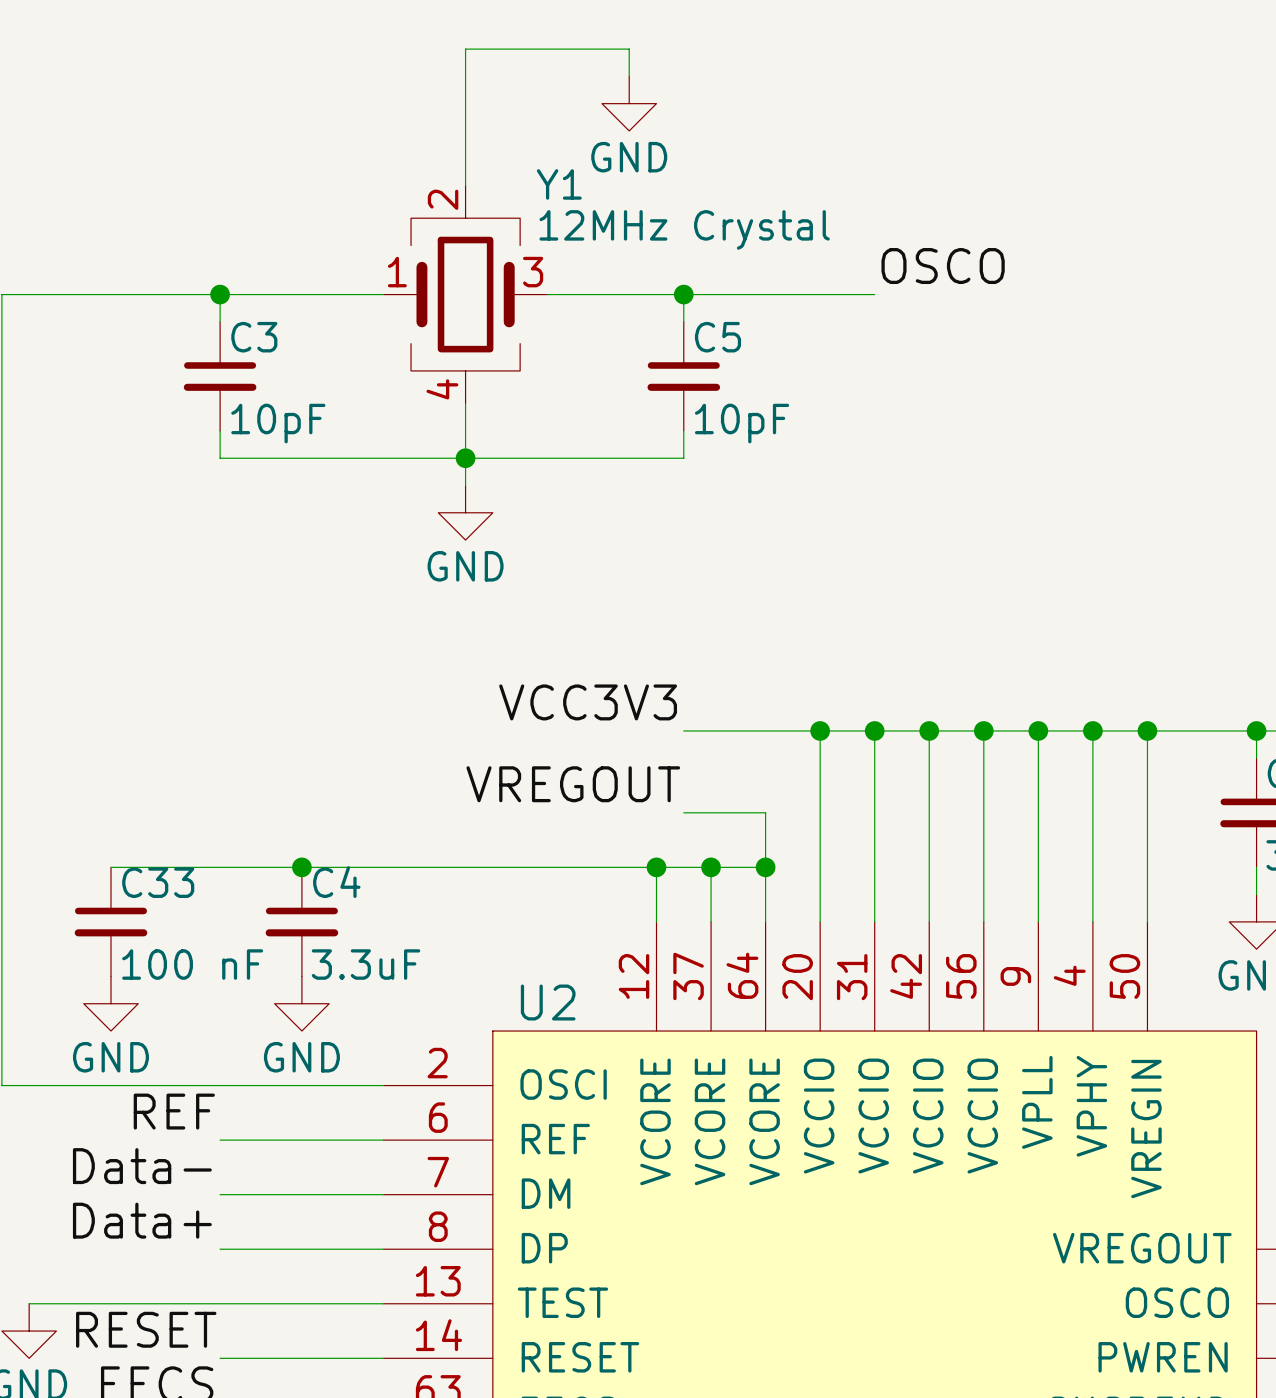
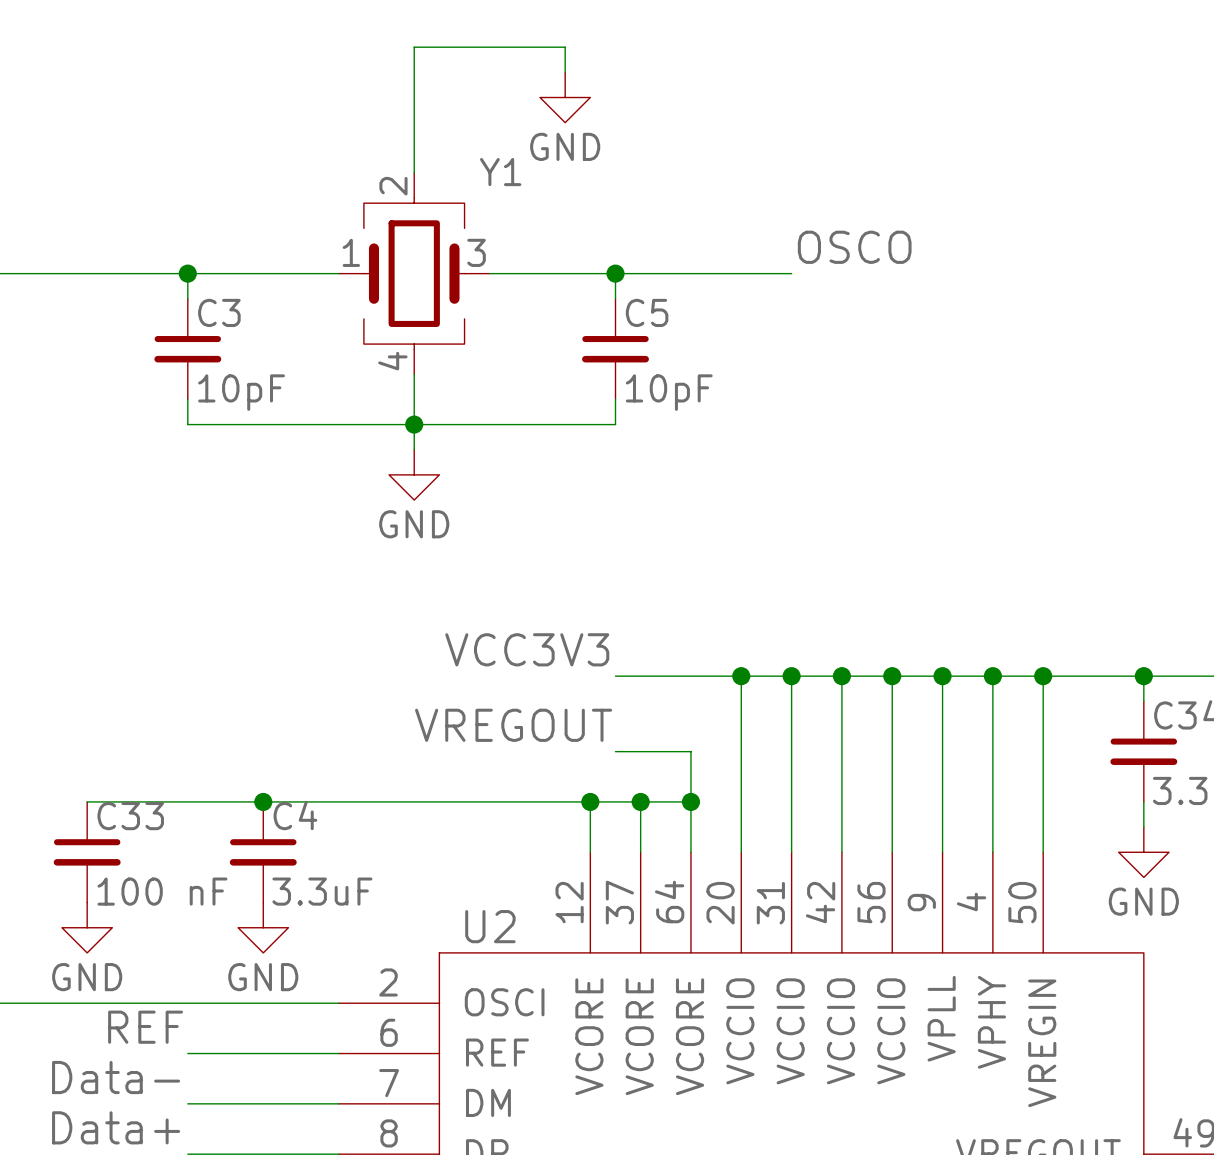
Y1 value: 12MHz Crystal (684, 229) -> none

